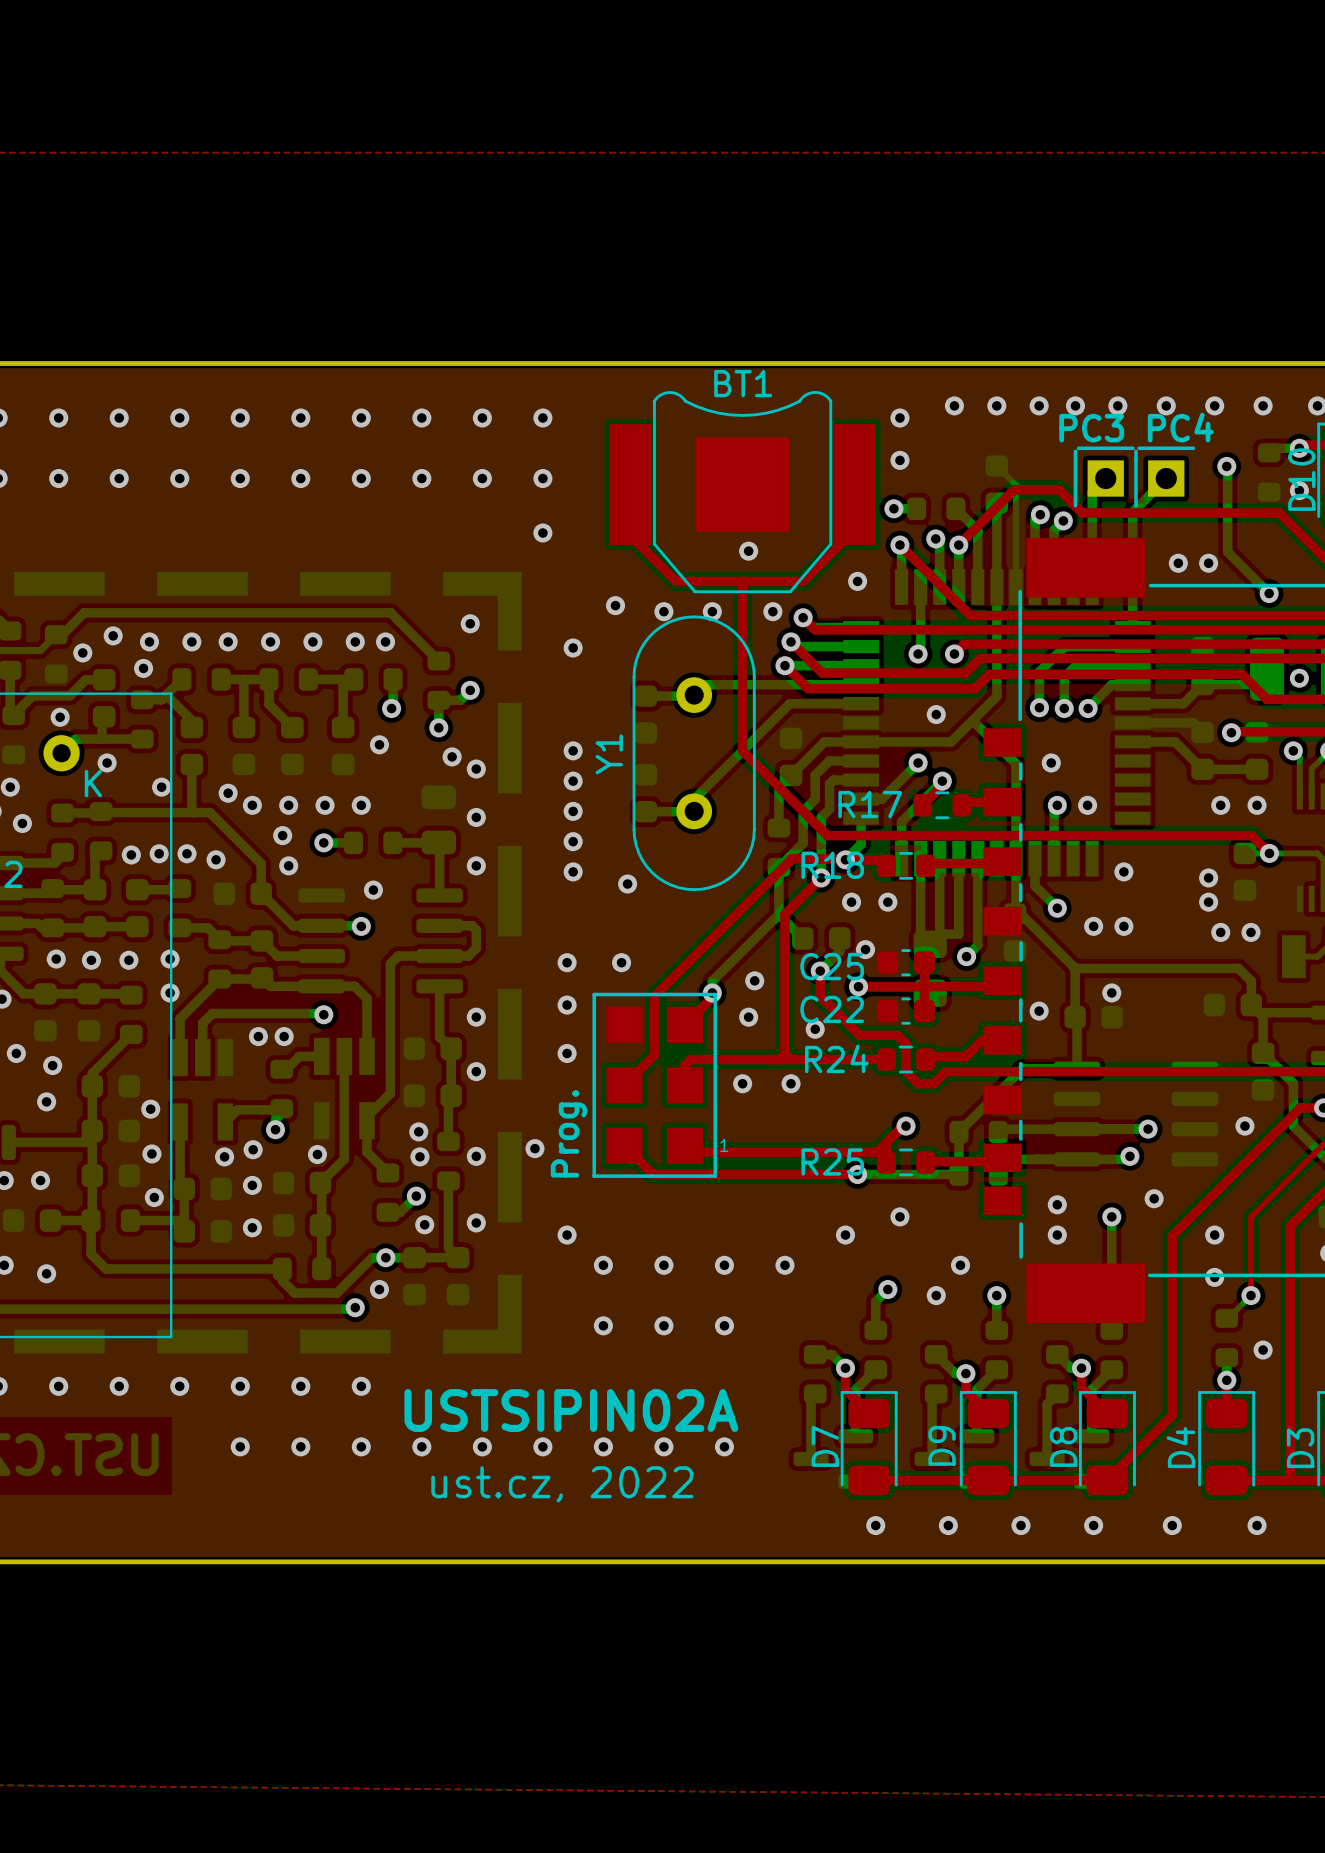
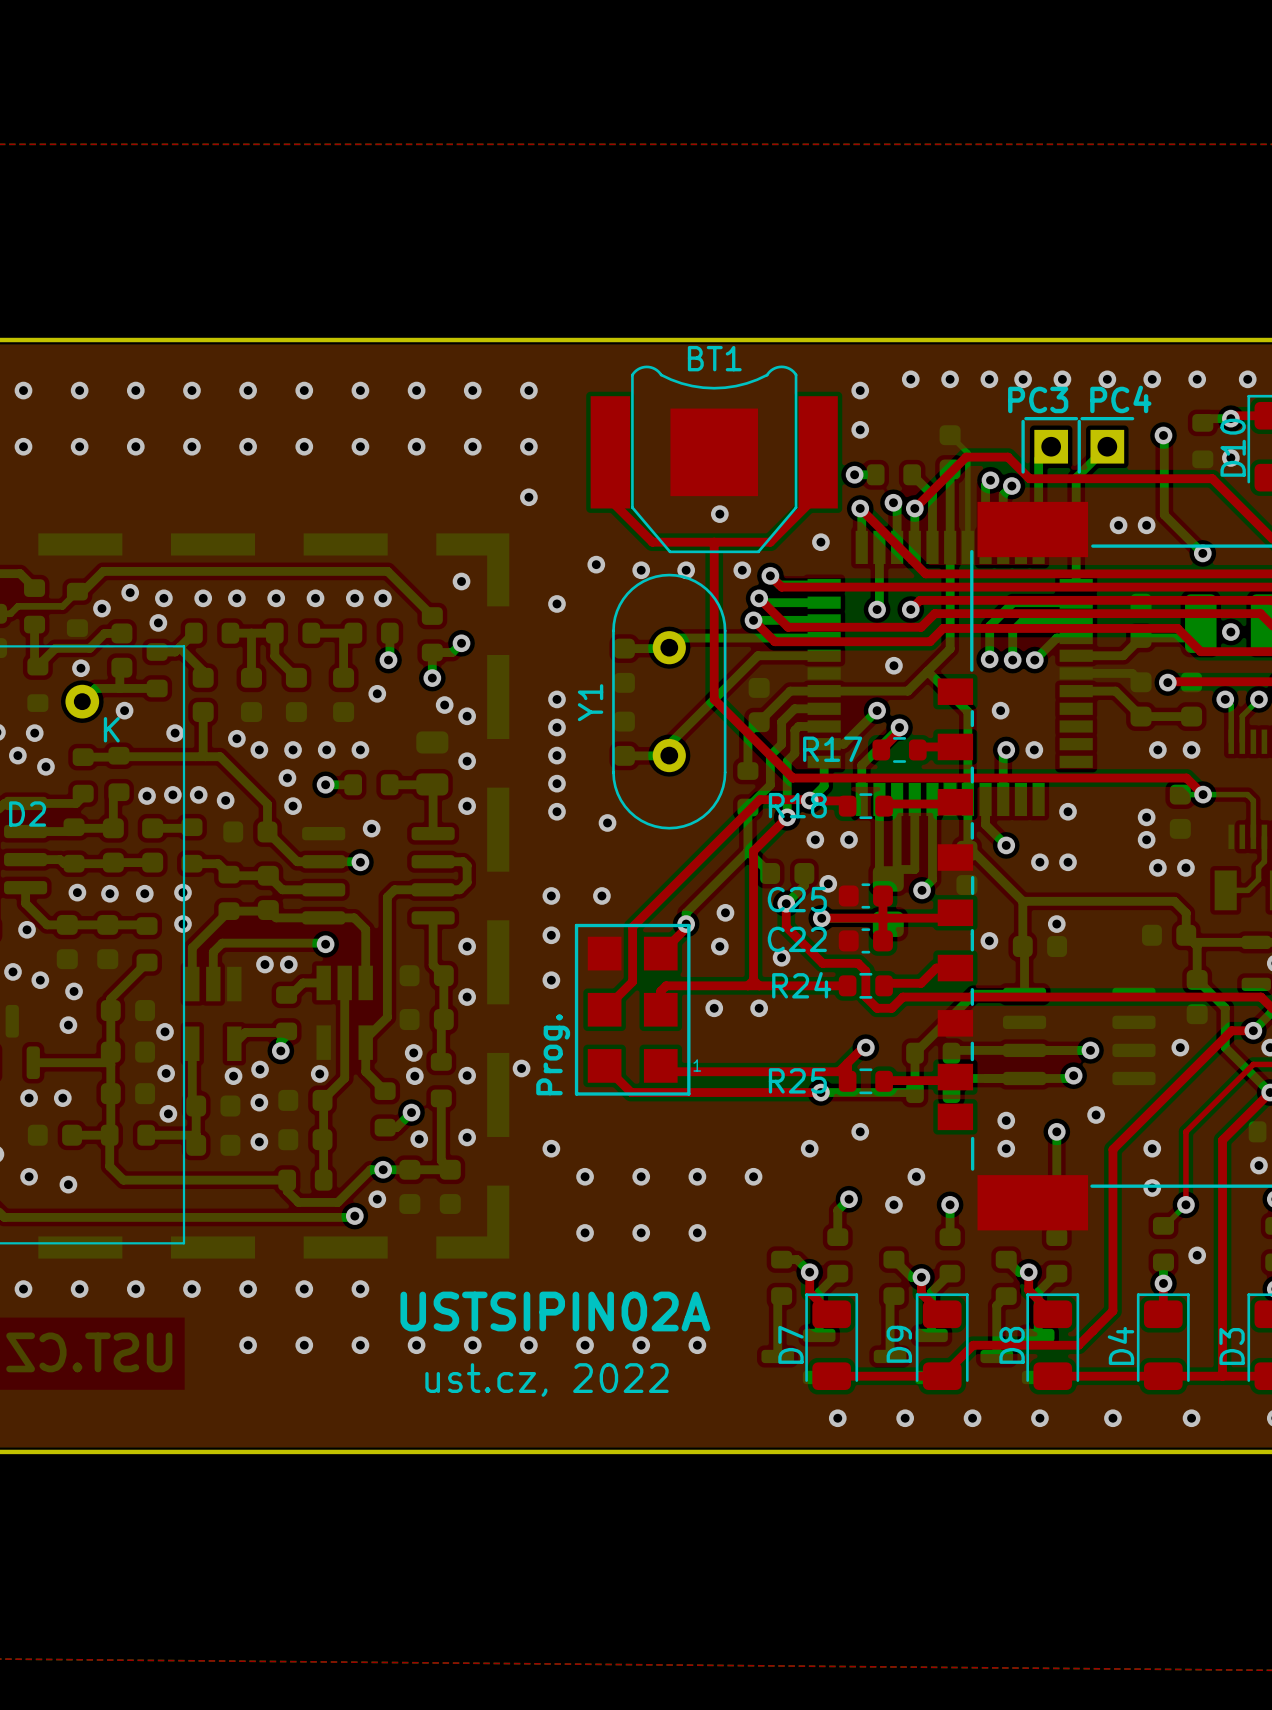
top track: (1172, 1409) (1172, 1415) (1107, 1480) (988, 1480) -> (1112, 1310) (1078, 1345) (973, 1345) (942, 1376)
top track: none -> (1052, 1376) (1163, 1376)

